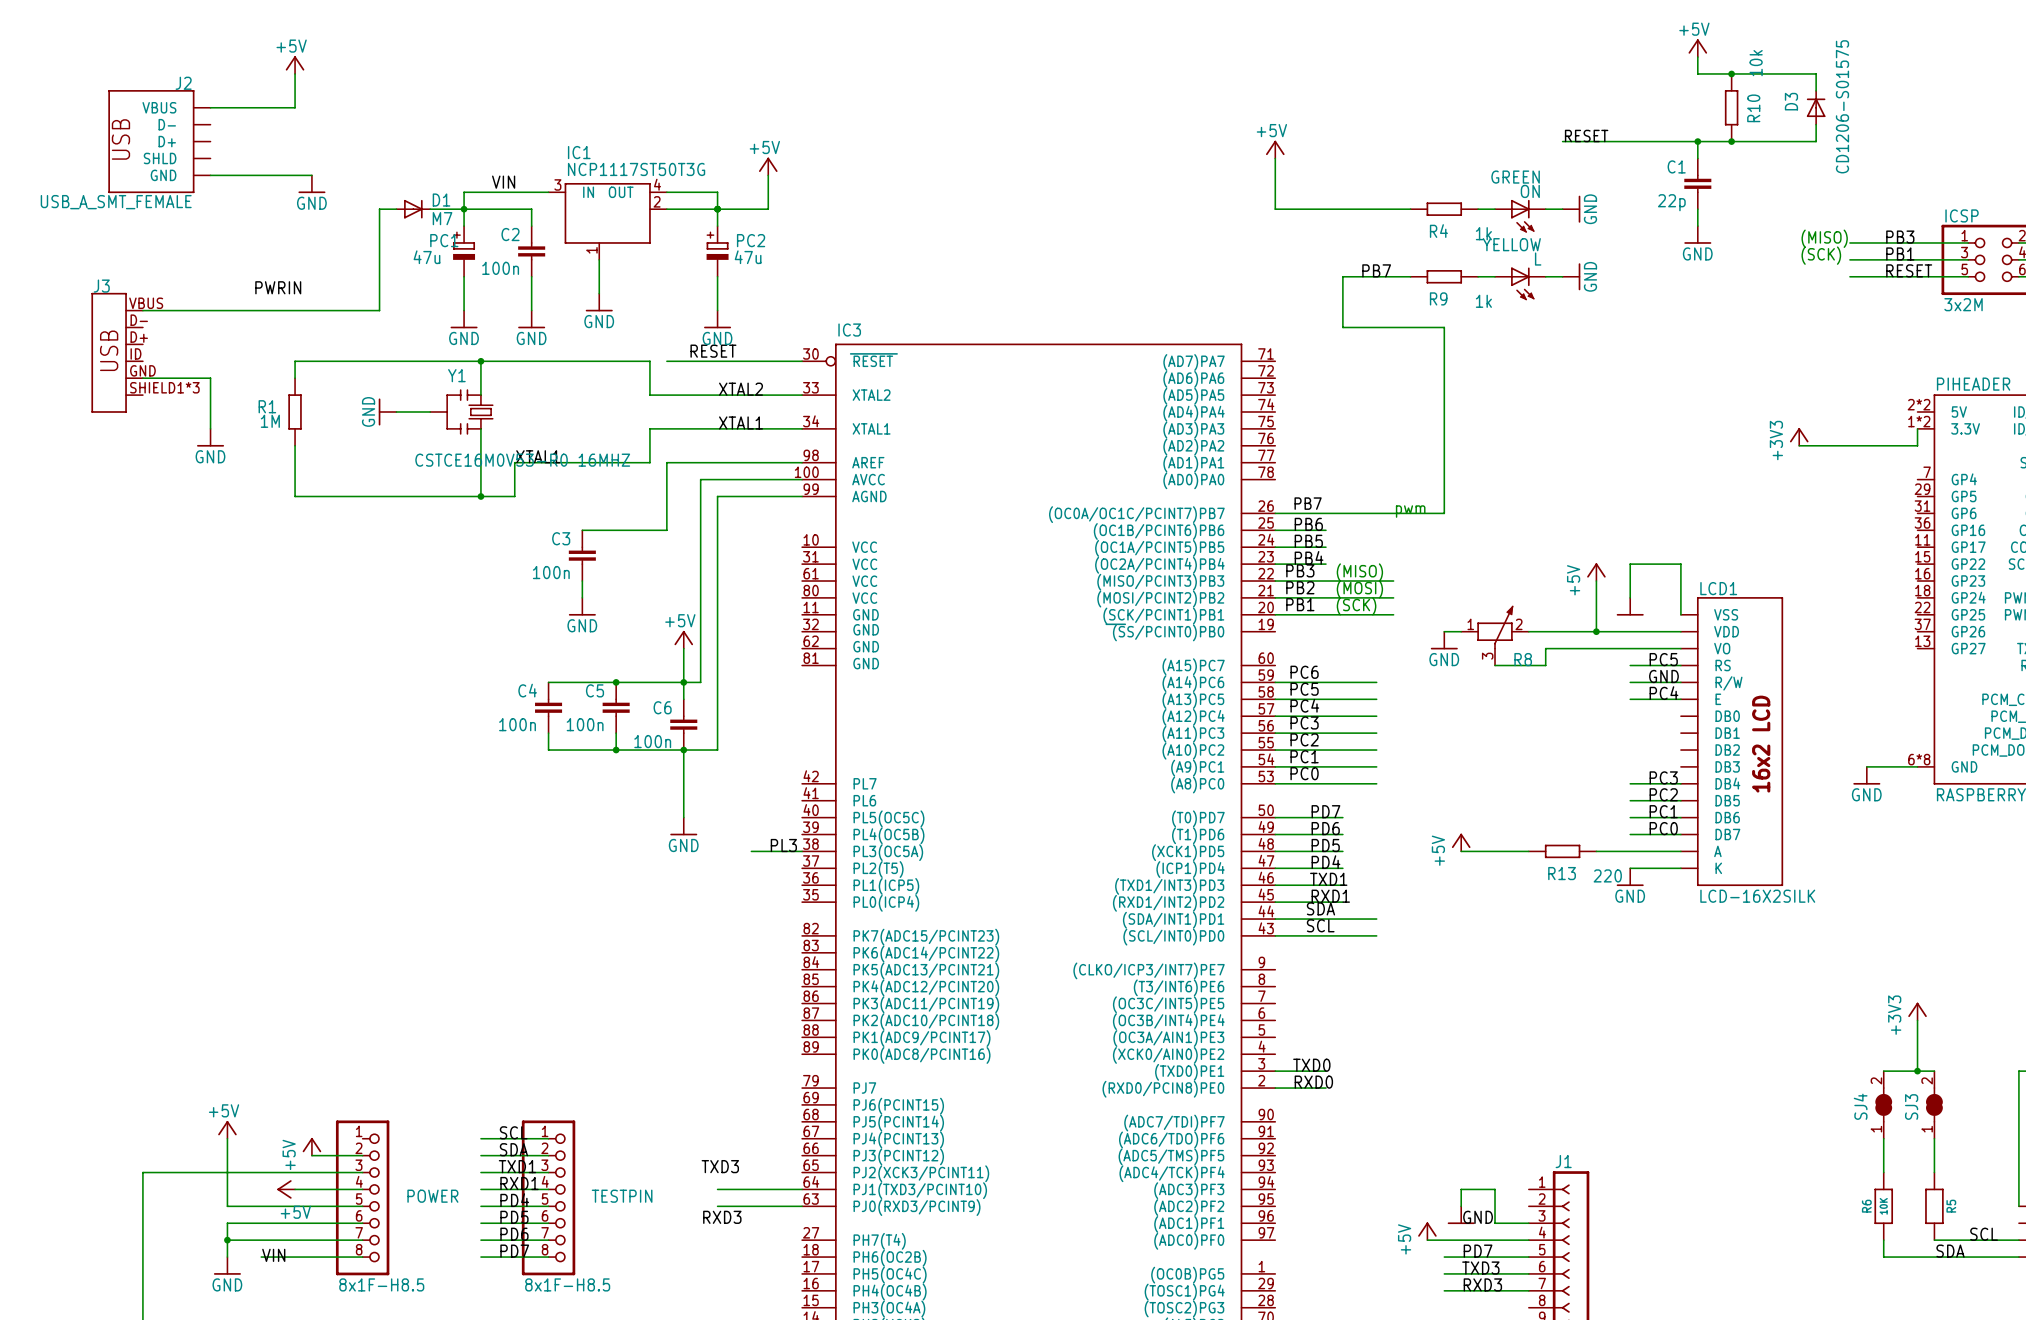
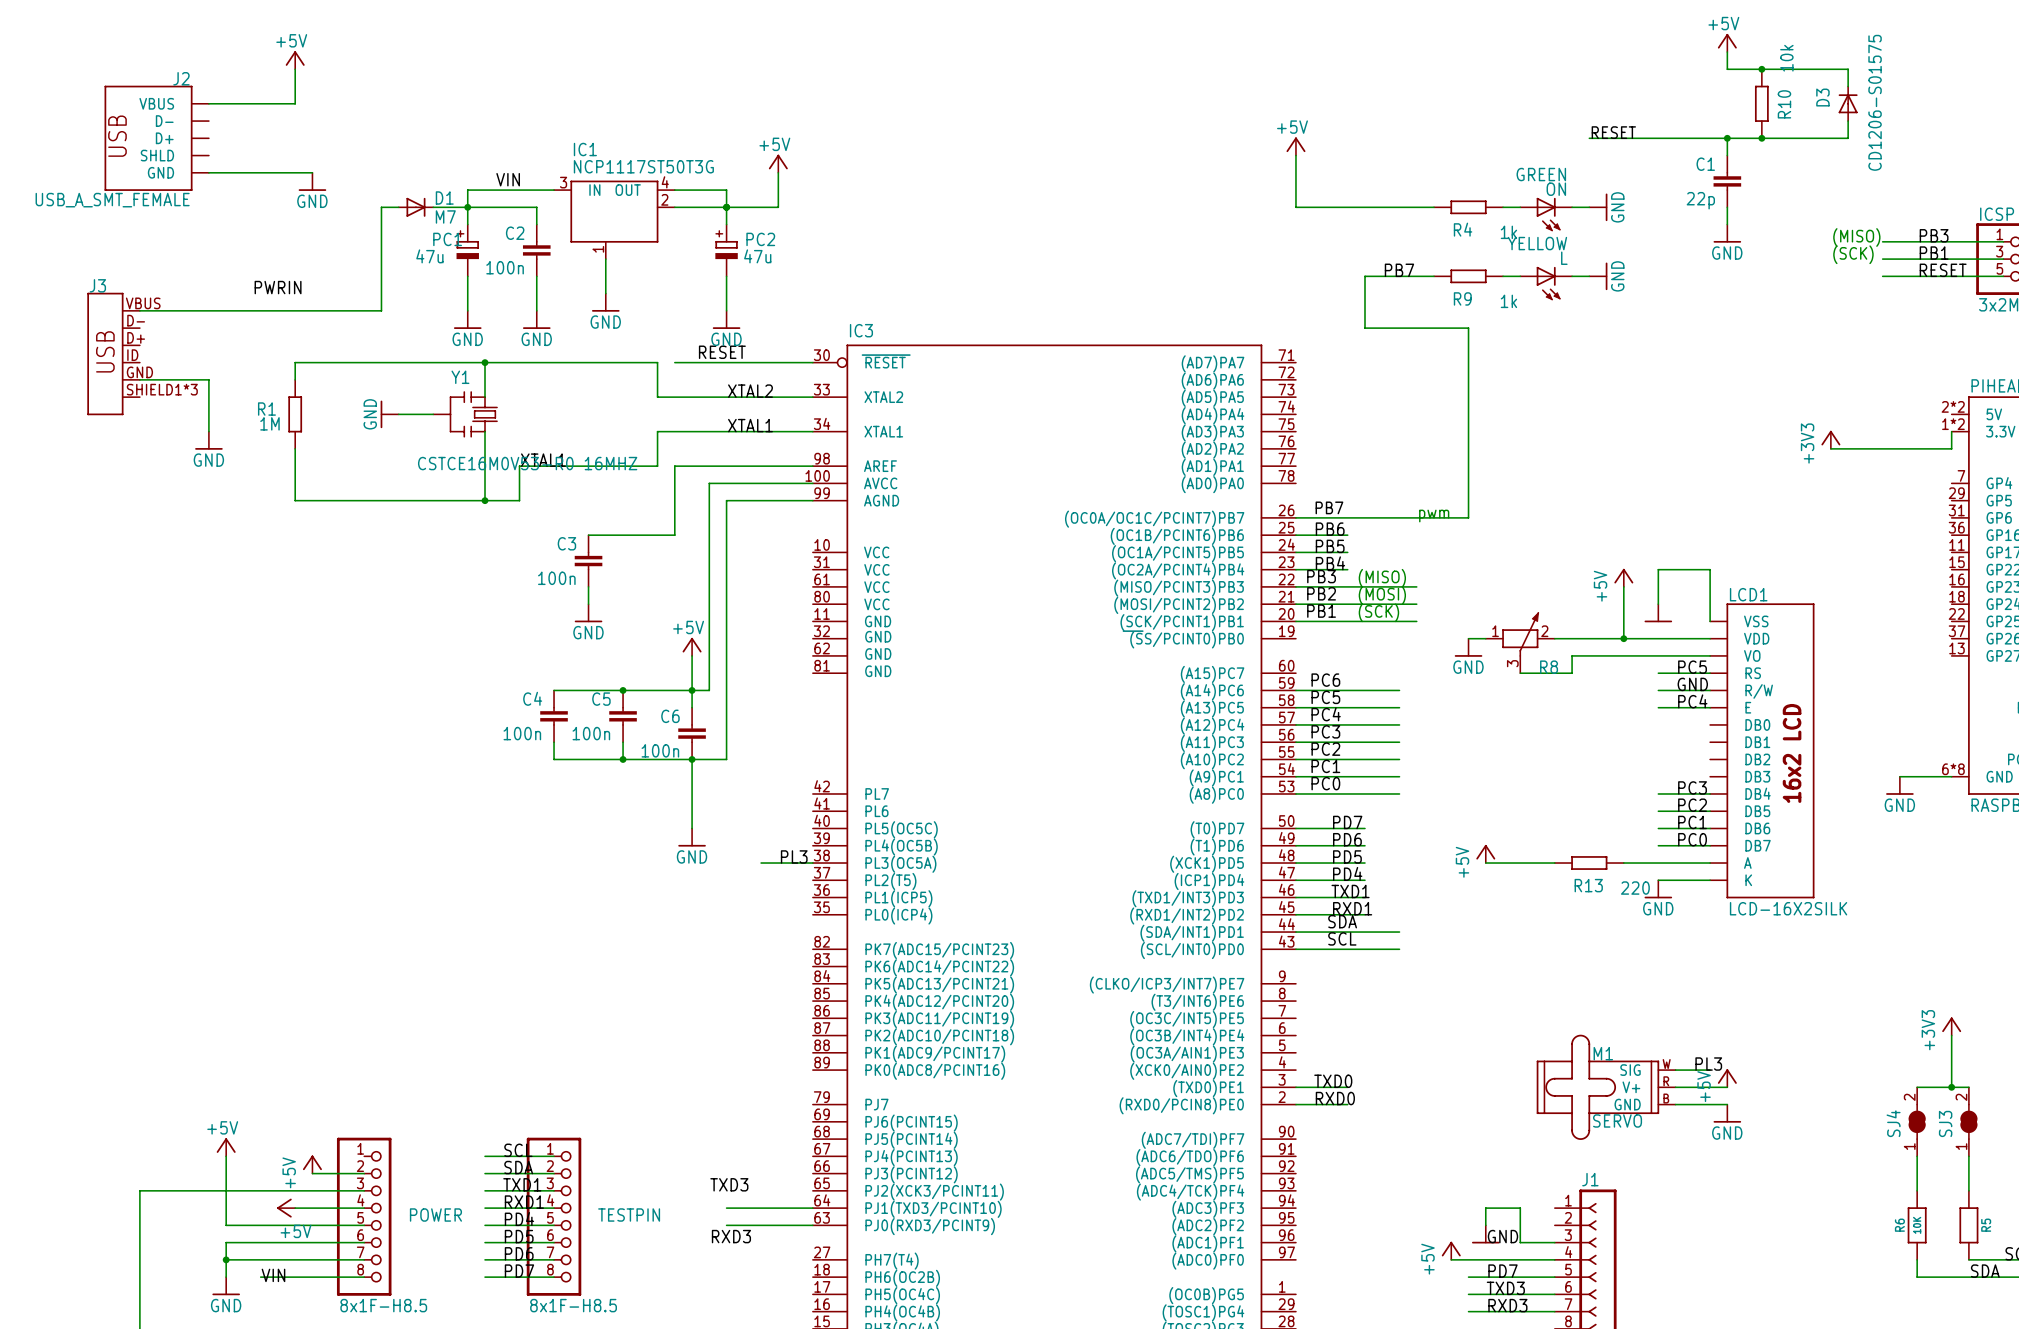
label: none -> PL3 (1708, 1064)
wire: none -> (1675, 1070) (1710, 1070)
power symbol: none -> +5V (1727, 1078)
M1: none -> SERVO (1606, 1087)
wire: none -> (1675, 1087) (1727, 1087)
wire: none -> (1675, 1104) (1727, 1104)
power symbol: none -> GND (1727, 1113)

